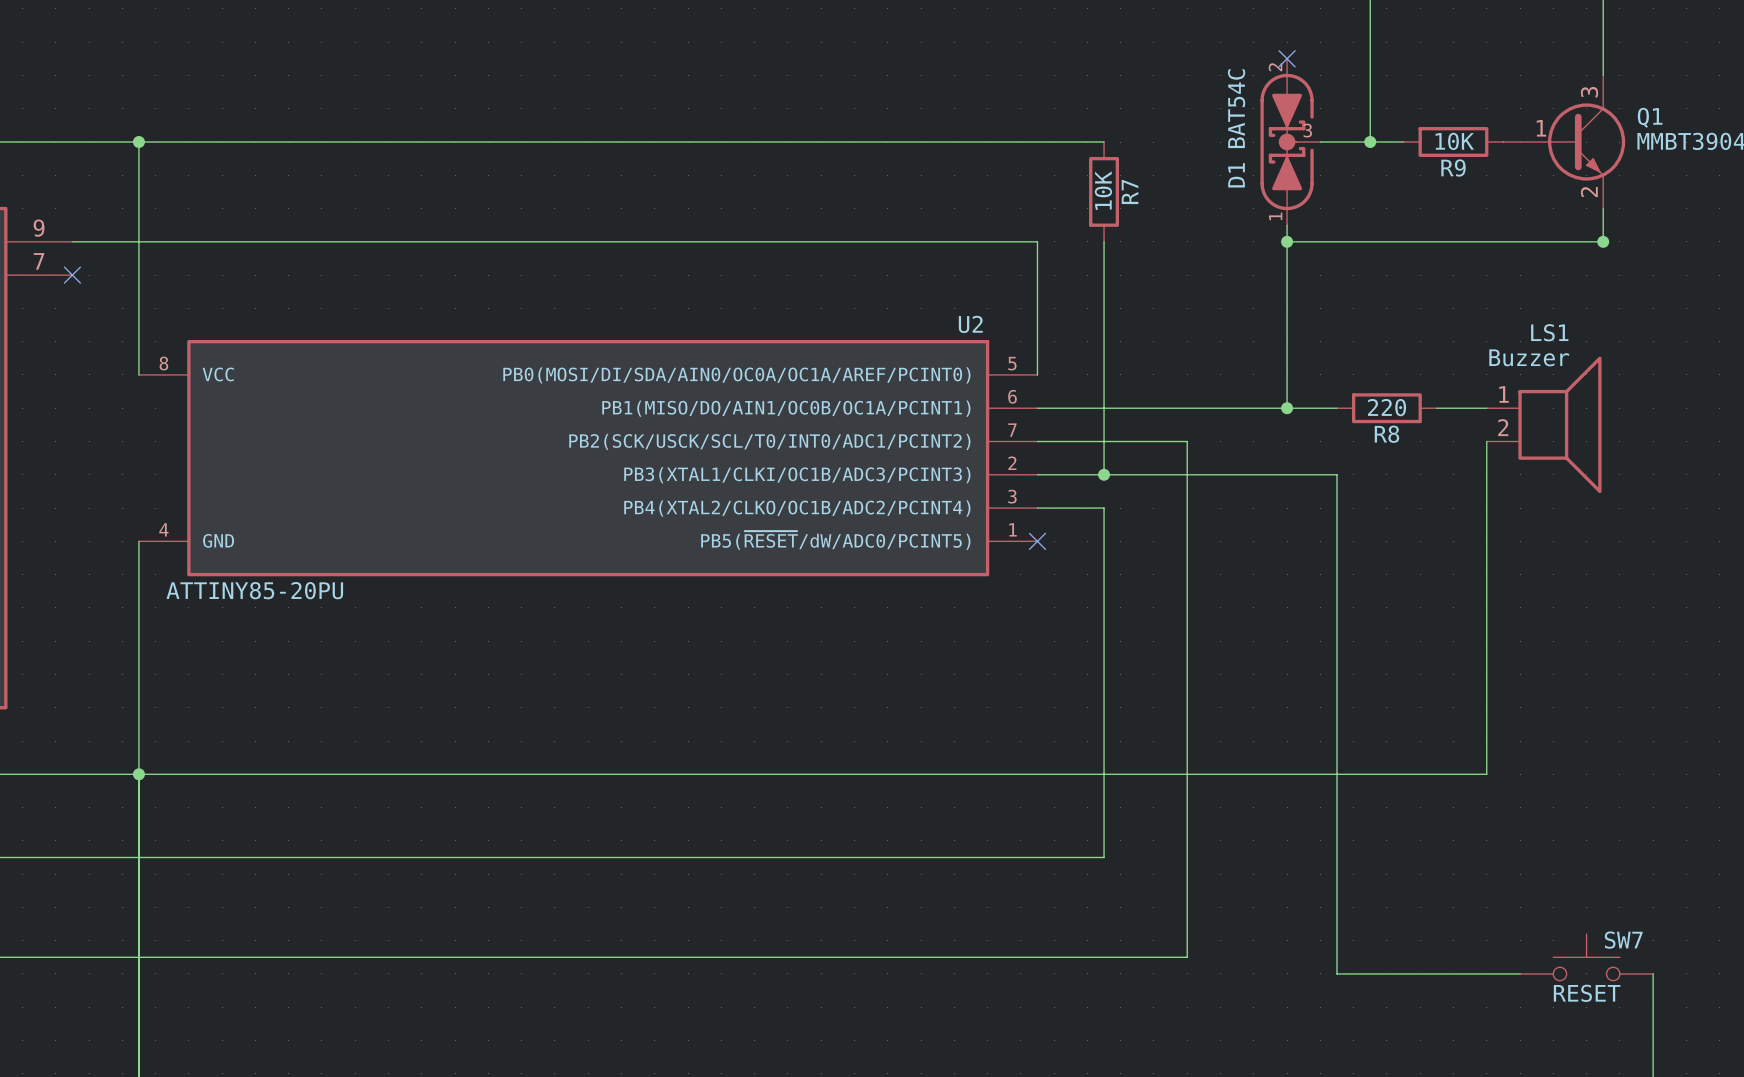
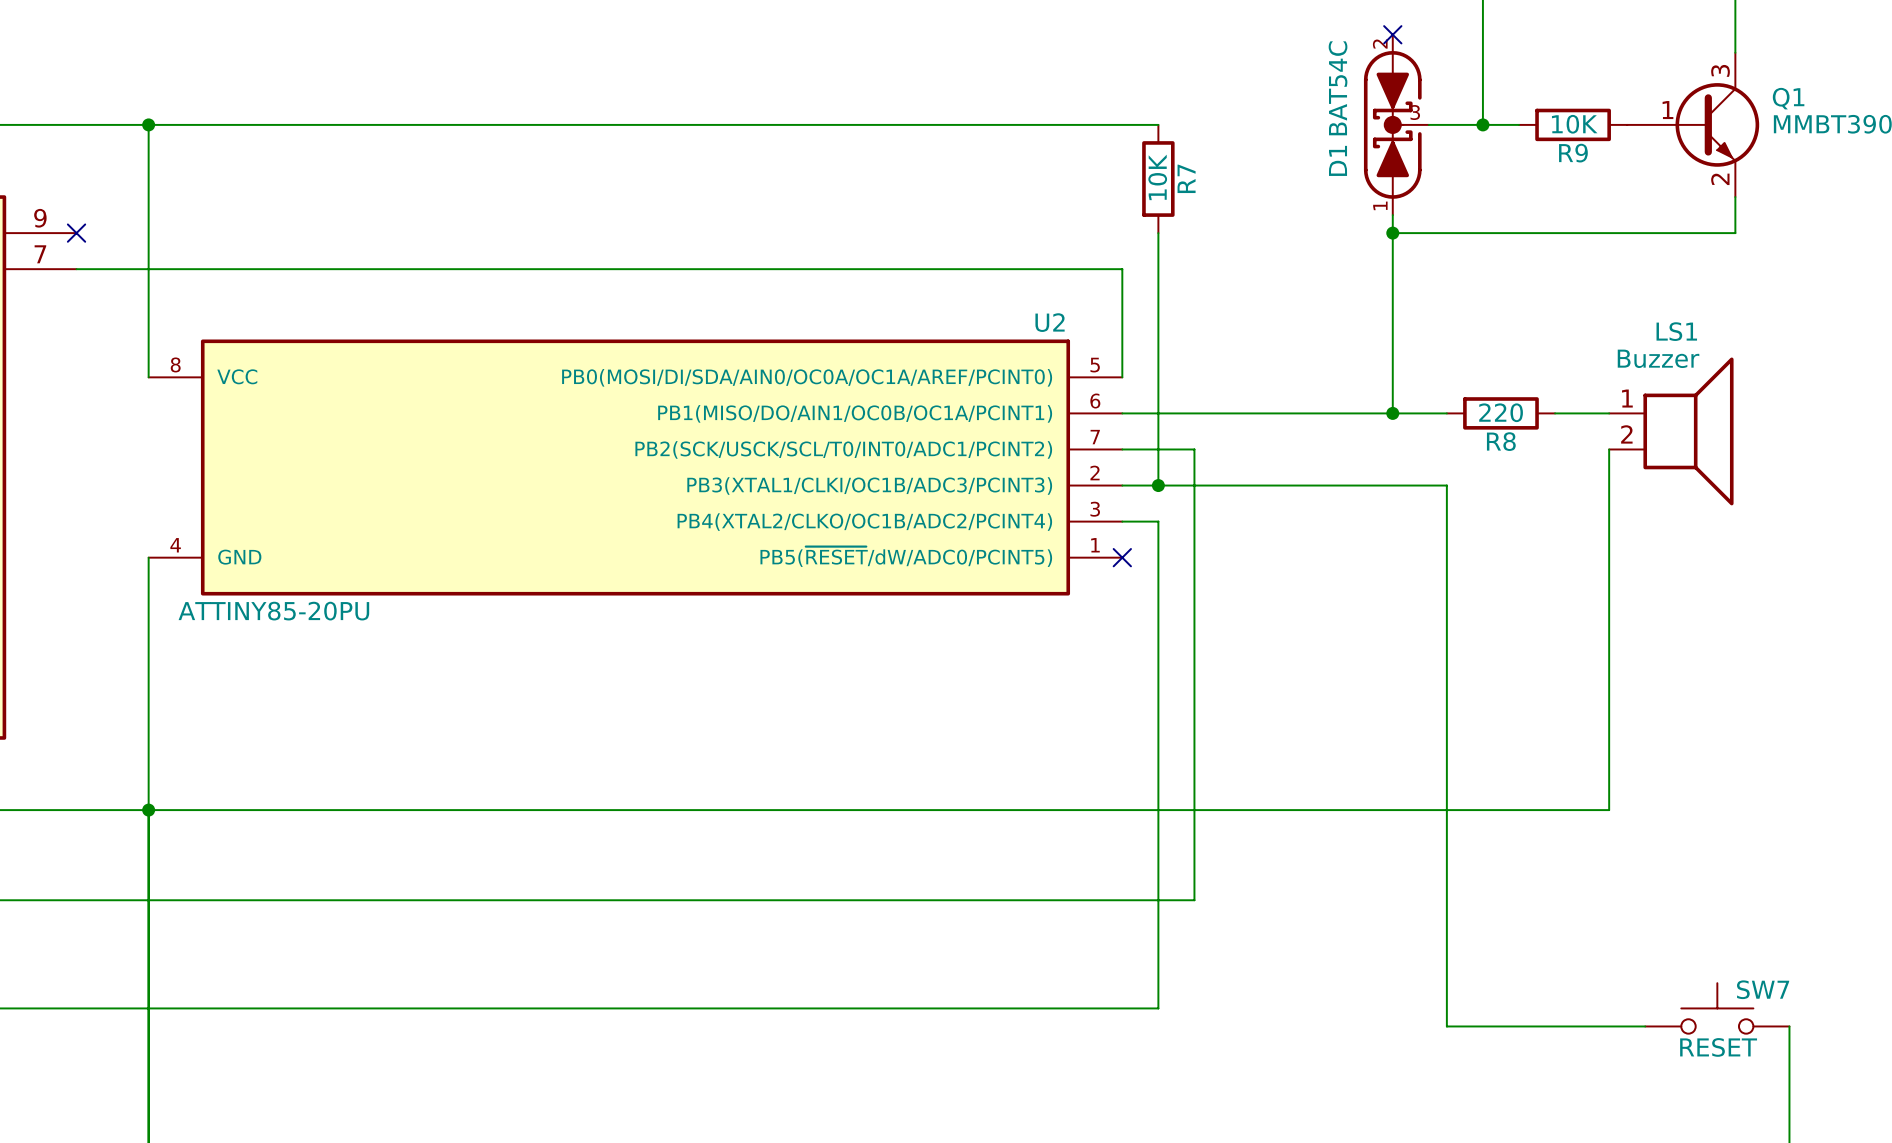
wire: (1070, 142) (1104, 142) -> none
R7 position: (1104, 191) -> (1158, 179)
wire: (72, 241) (1037, 241) (1037, 275) -> (76, 269) (1122, 269)
wire: none -> (1158, 233) (1158, 485)
wire: (1104, 241) (1104, 441) (1187, 441) (1187, 957) (1070, 957) -> (1158, 521) (1158, 1008)
junction: (1603, 241) -> none
no-connect mark position: (72, 275) -> (76, 233)
junction position: (1104, 474) -> (1158, 485)
wire: (1070, 508) (1104, 508) -> (1194, 485) (1194, 521)

